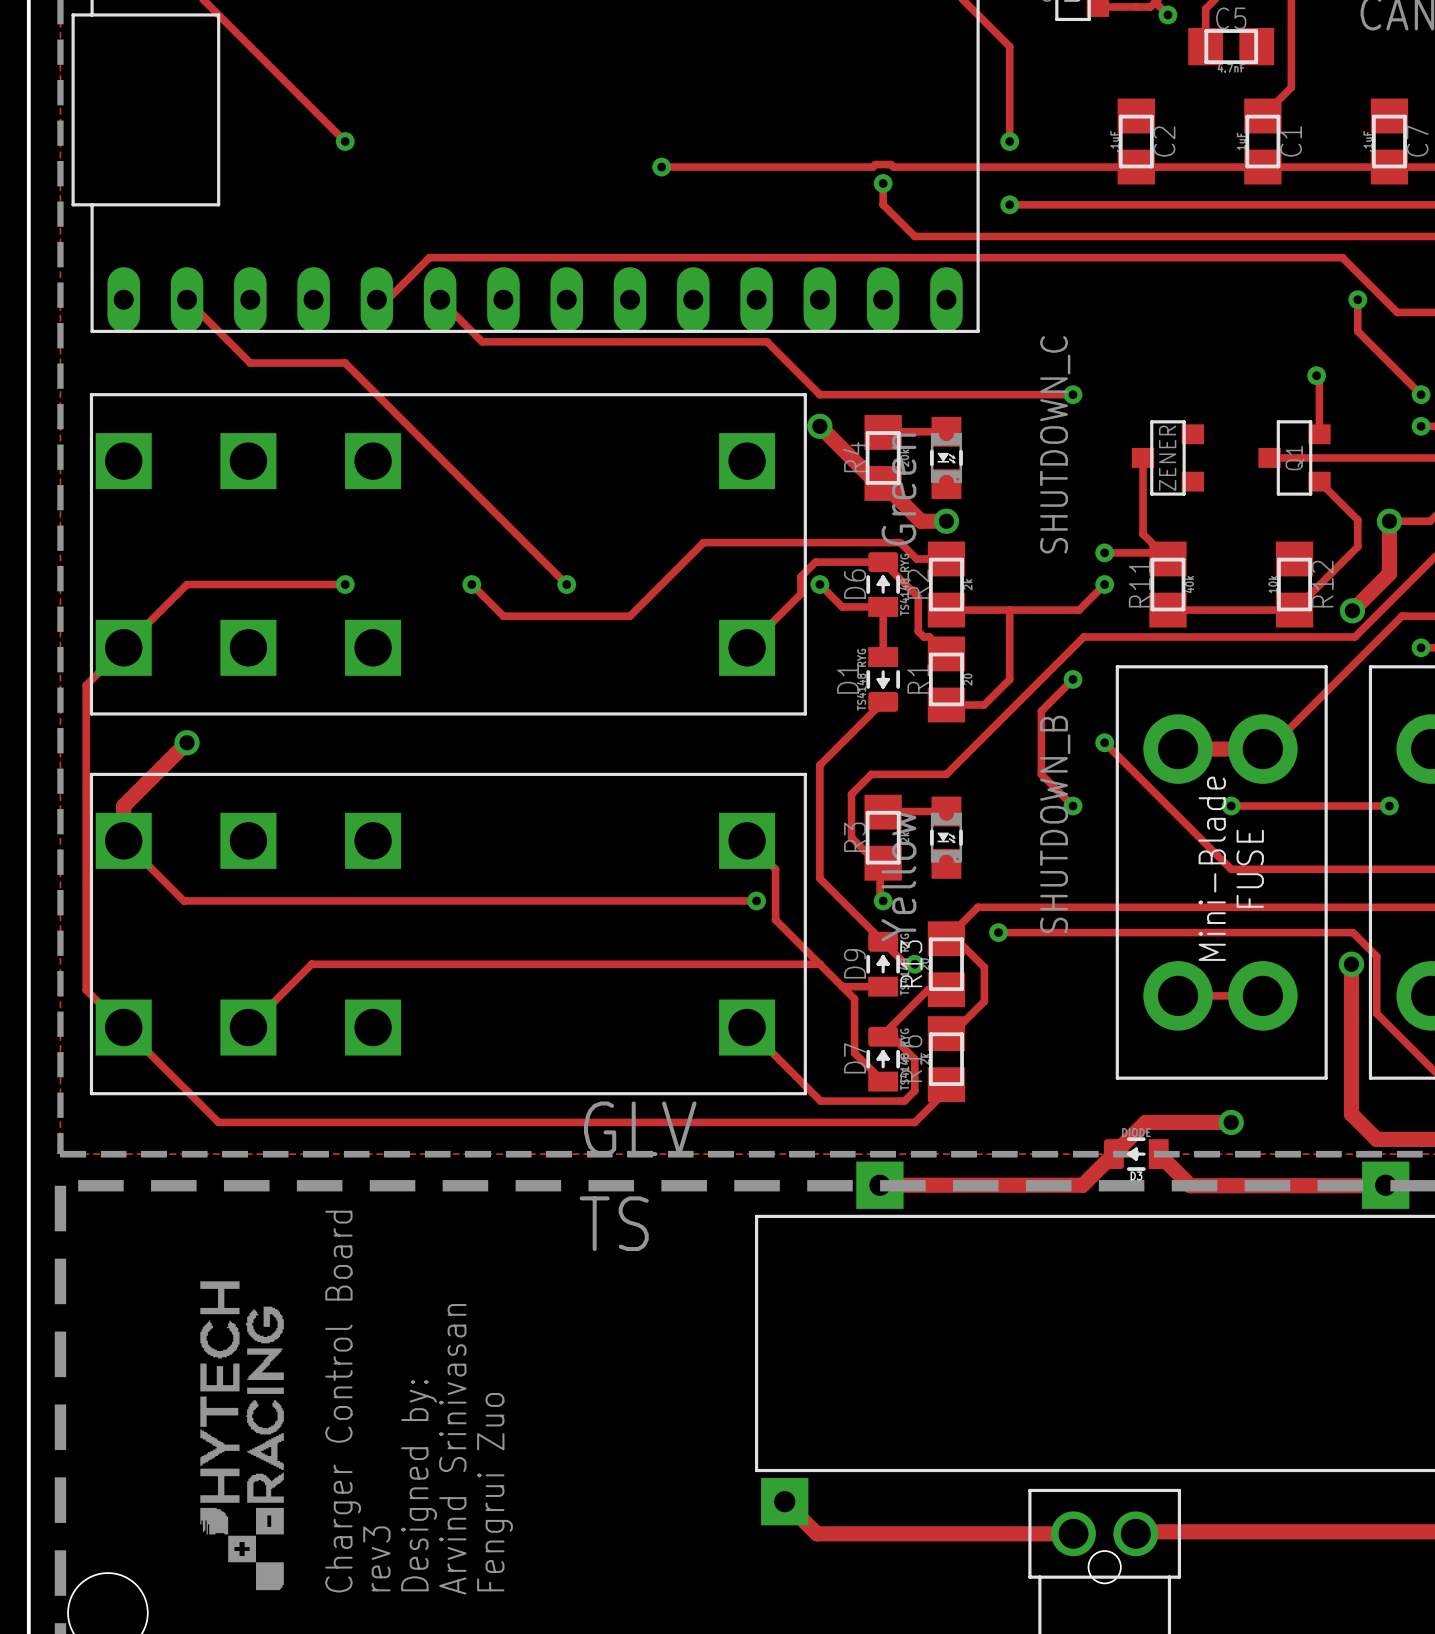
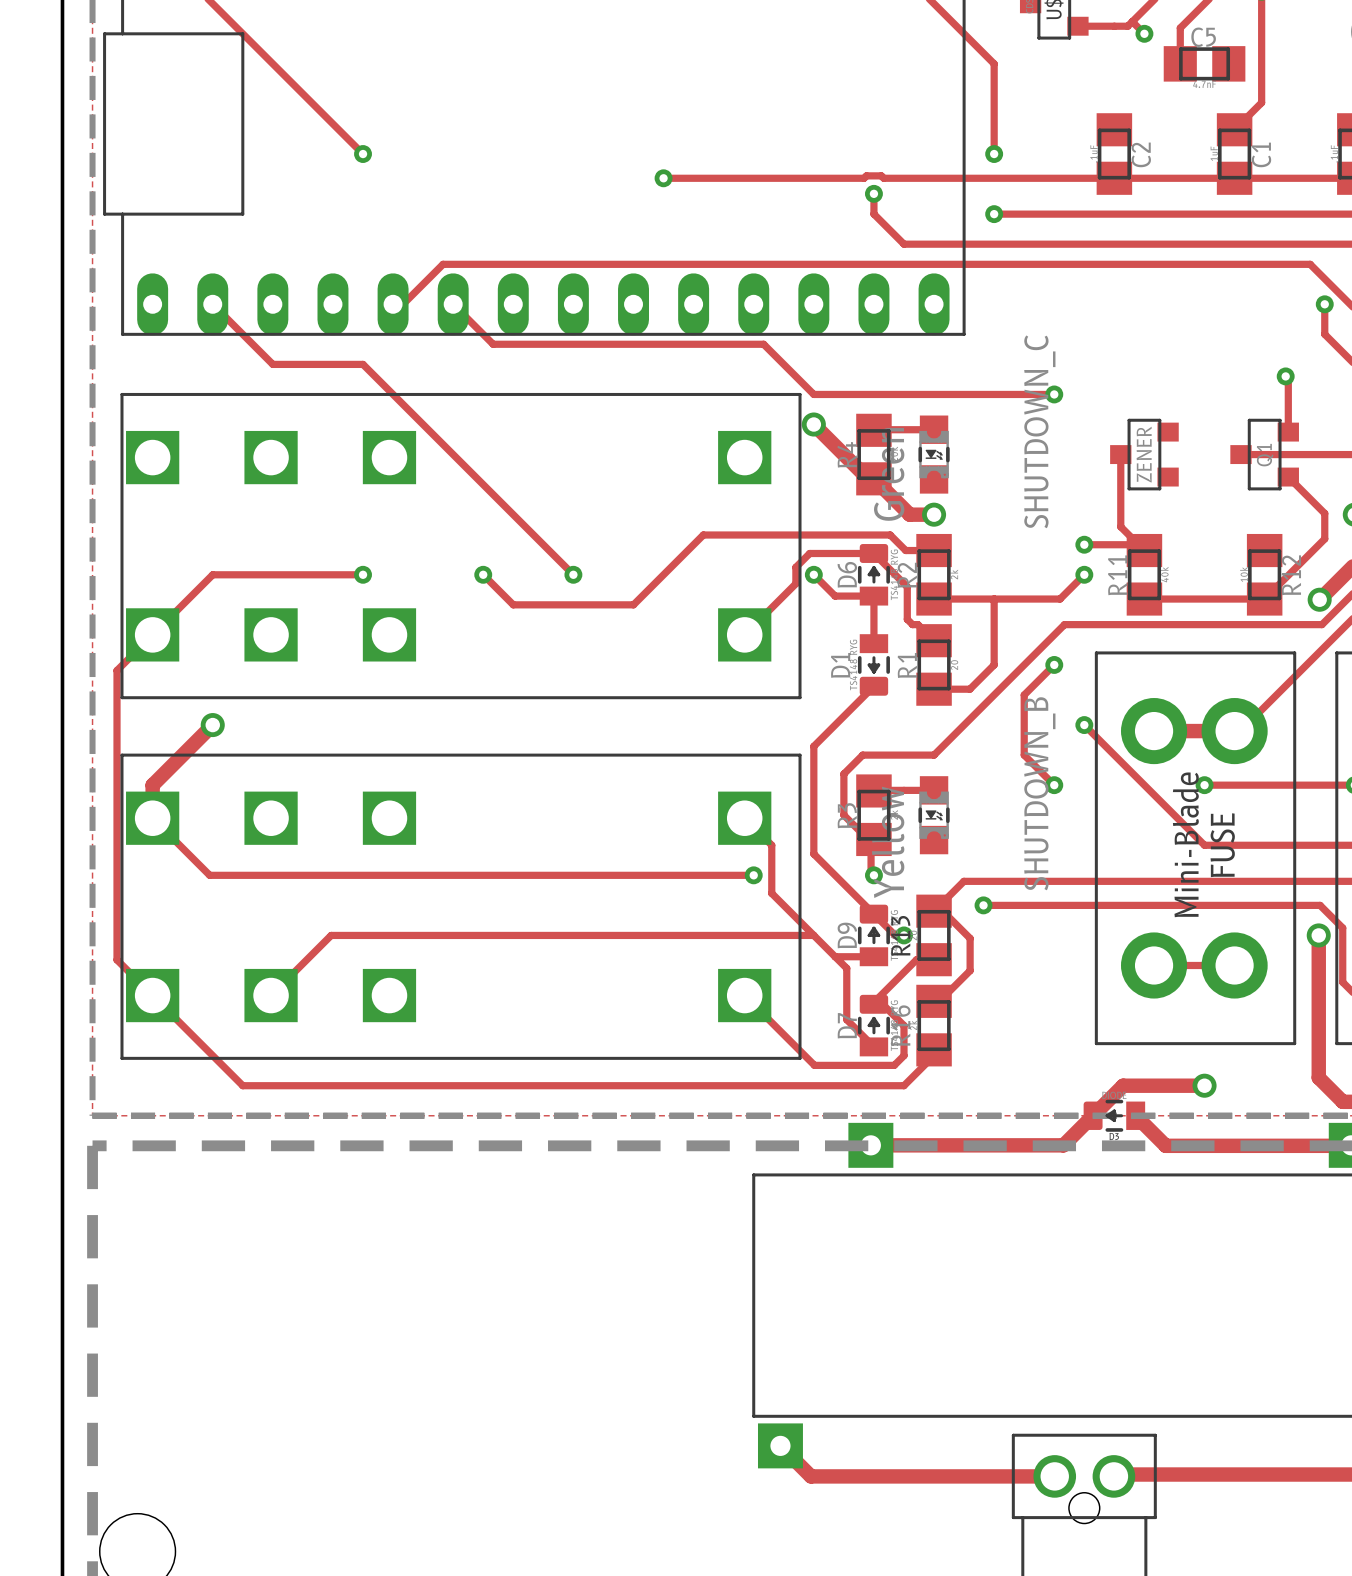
text: GLV (640, 1128) -> none
text: TS (614, 1223) -> none
drawing: [200, 1281, 284, 1591] -> none
text: Charger Control Board (343, 1401) -> none
text: Arvind Srinivasan (452, 1449) -> none
text: Designed by: (419, 1485) -> none
text: Fengrui Zuo (495, 1492) -> none
text: rev3 (376, 1558) -> none

